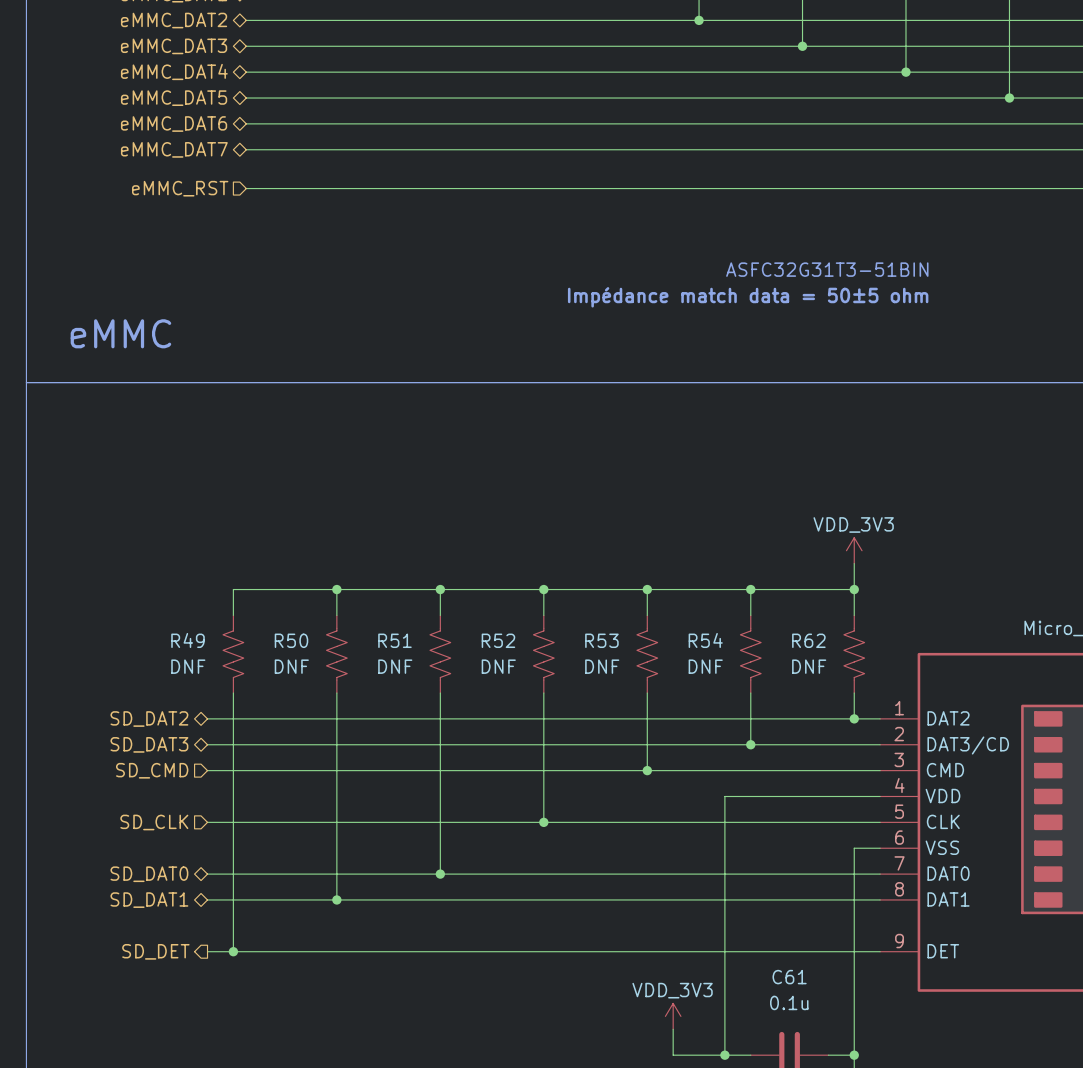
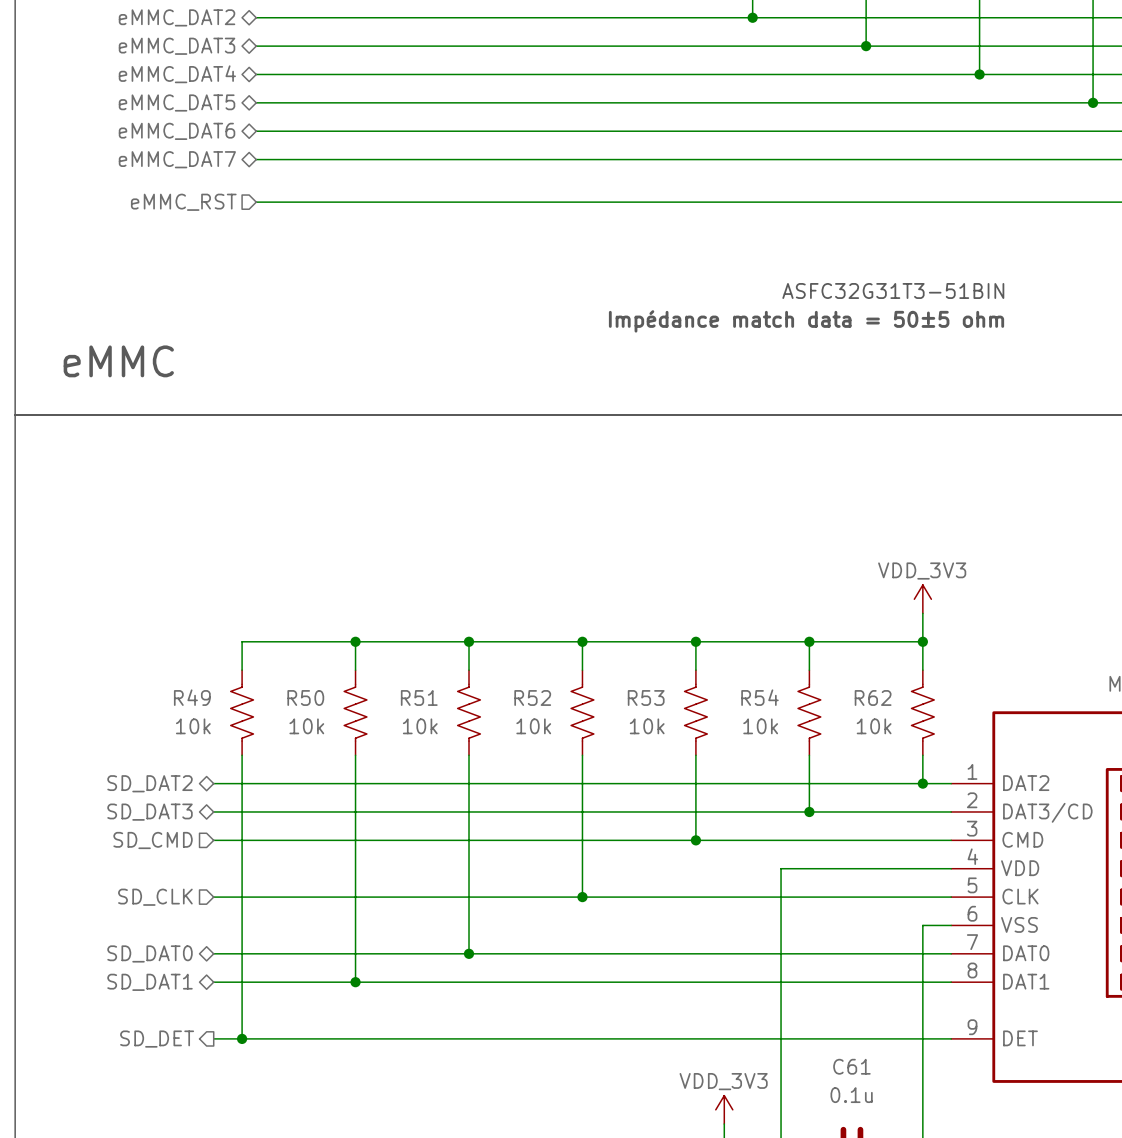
R49 value: DNF (188, 666) -> 10k (193, 726)
R50 value: DNF (291, 666) -> 10k (306, 726)
R51 value: DNF (395, 666) -> 10k (420, 726)
R52 value: DNF (498, 666) -> 10k (533, 726)
R53 value: DNF (602, 666) -> 10k (647, 726)
R54 value: DNF (705, 666) -> 10k (760, 726)
R62 value: DNF (809, 666) -> 10k (874, 726)

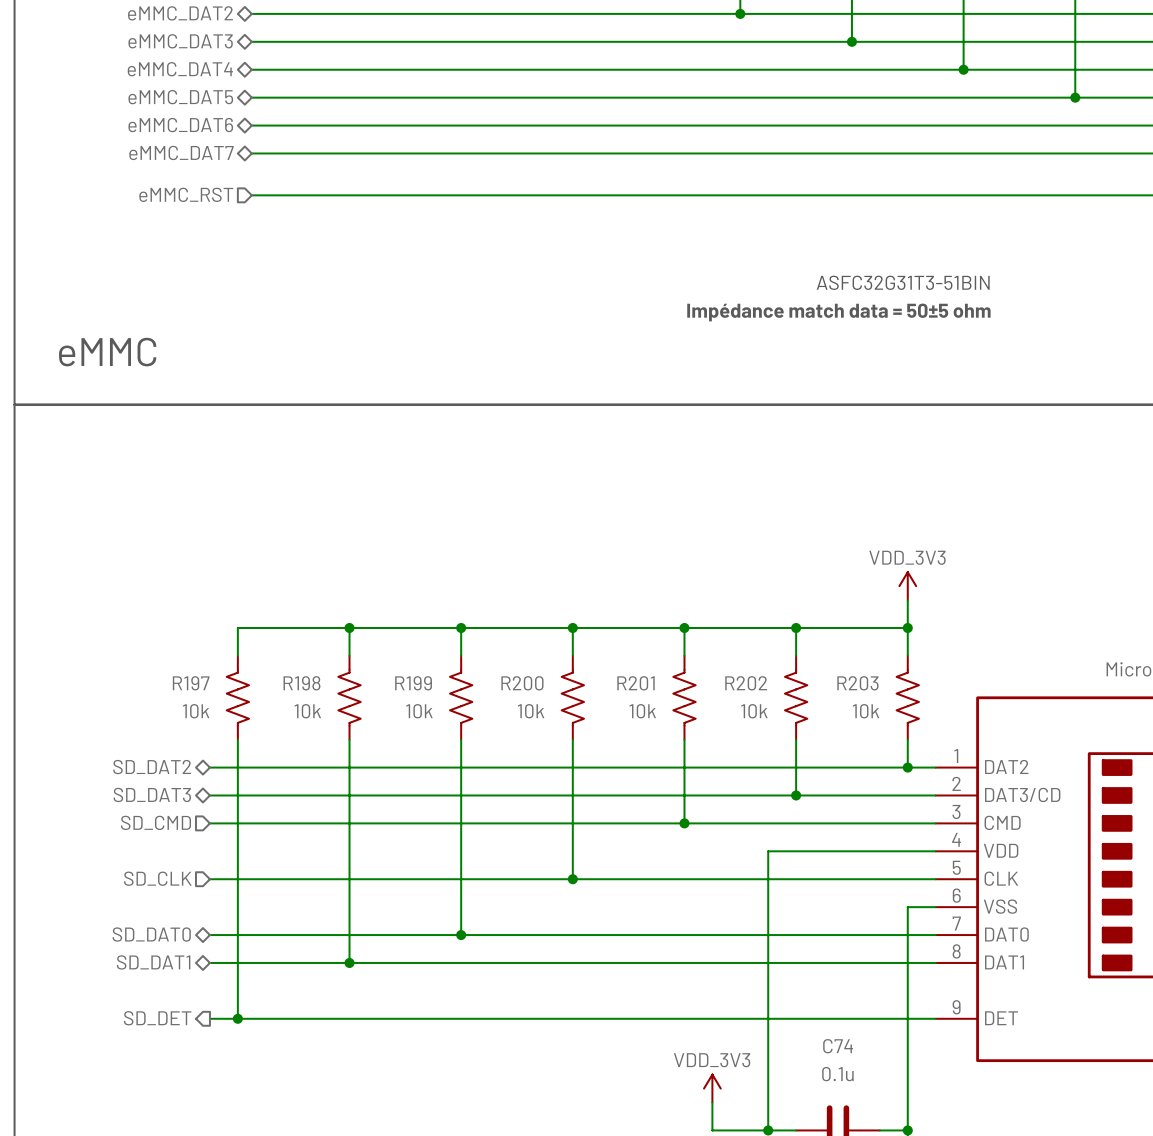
R49 name: R49 (192, 697) -> R197 (191, 683)
R50 name: R50 (305, 697) -> R198 (301, 683)
R51 name: R51 (419, 697) -> R199 (413, 683)
R52 name: R52 (532, 697) -> R200 (522, 683)
R53 name: R53 (646, 697) -> R201 (636, 683)
R54 name: R54 (759, 697) -> R202 (746, 683)
R62 name: R62 (873, 697) -> R203 (857, 683)
C61 name: C61 (851, 1066) -> C74 (838, 1046)

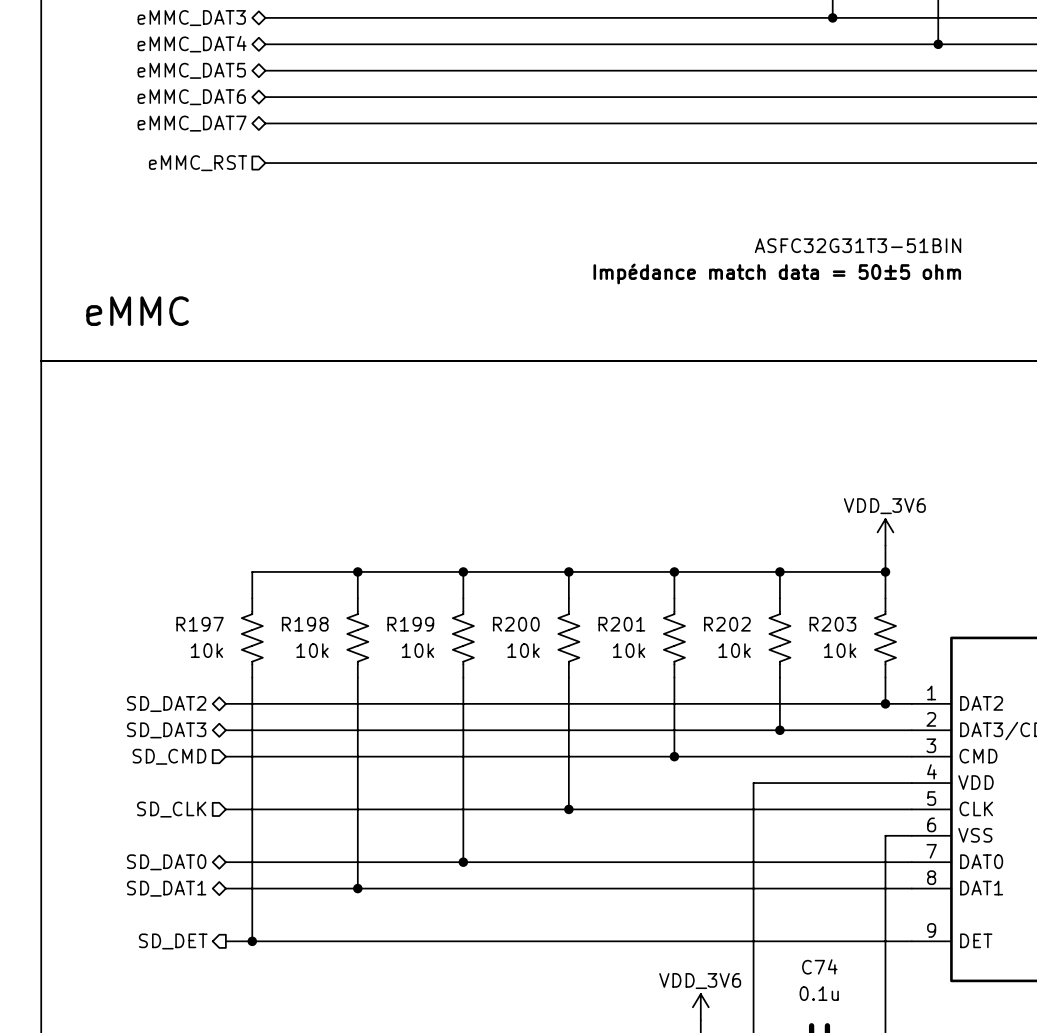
power symbol: VDD_3V3 (907, 586) -> VDD_3V6 (885, 532)
power symbol: VDD_3V3 (712, 1088) -> VDD_3V6 (700, 1007)

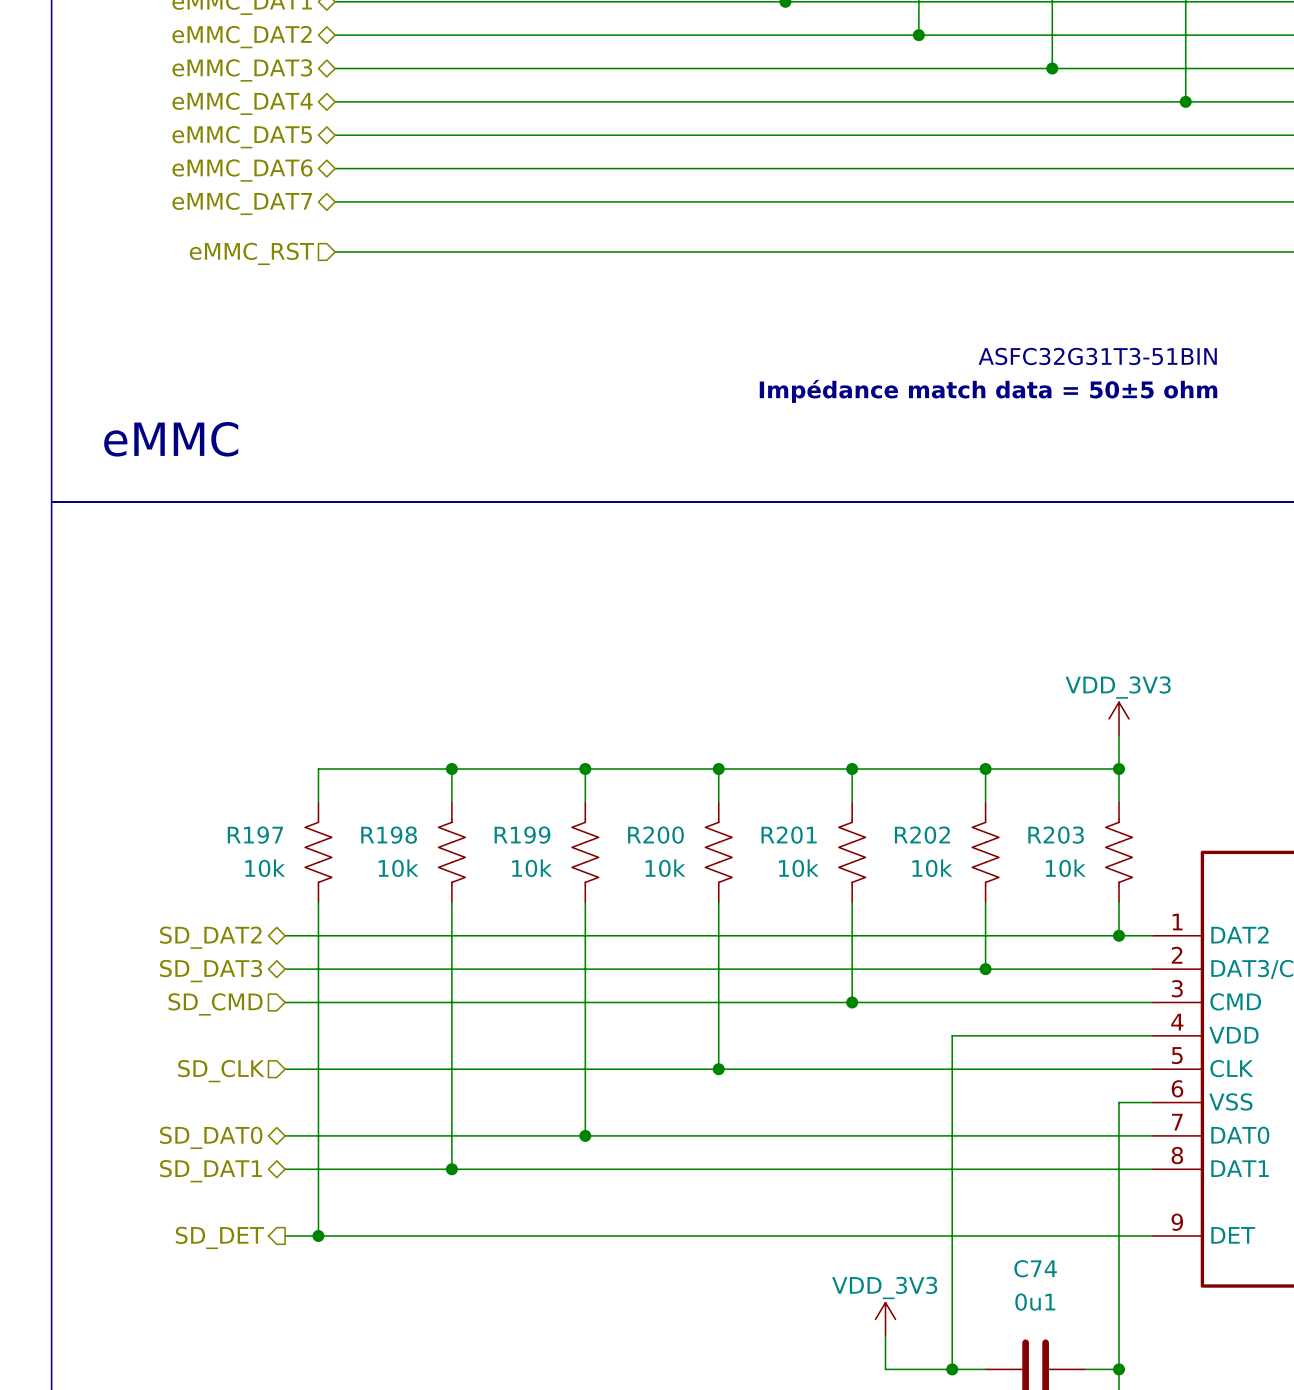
power symbol: VDD_3V6 (885, 532) -> VDD_3V3 (1119, 718)
C74 value: 0.1u (819, 993) -> 0u1 (1035, 1302)
power symbol: VDD_3V6 (700, 1007) -> VDD_3V3 (885, 1319)

